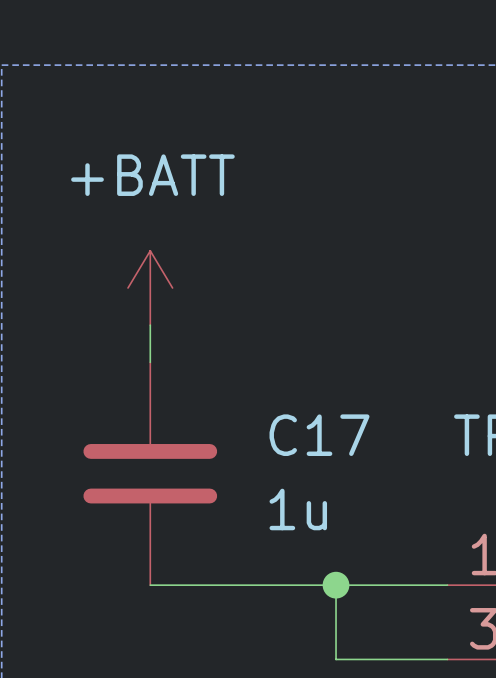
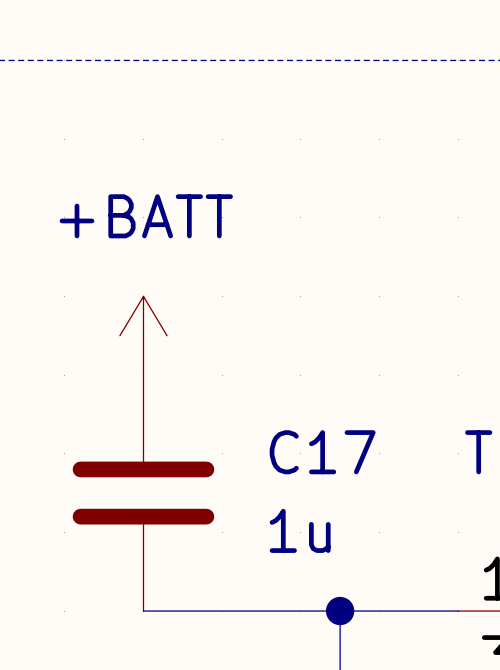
power symbol position: +BATT (150, 287) -> +BATT (143, 335)

